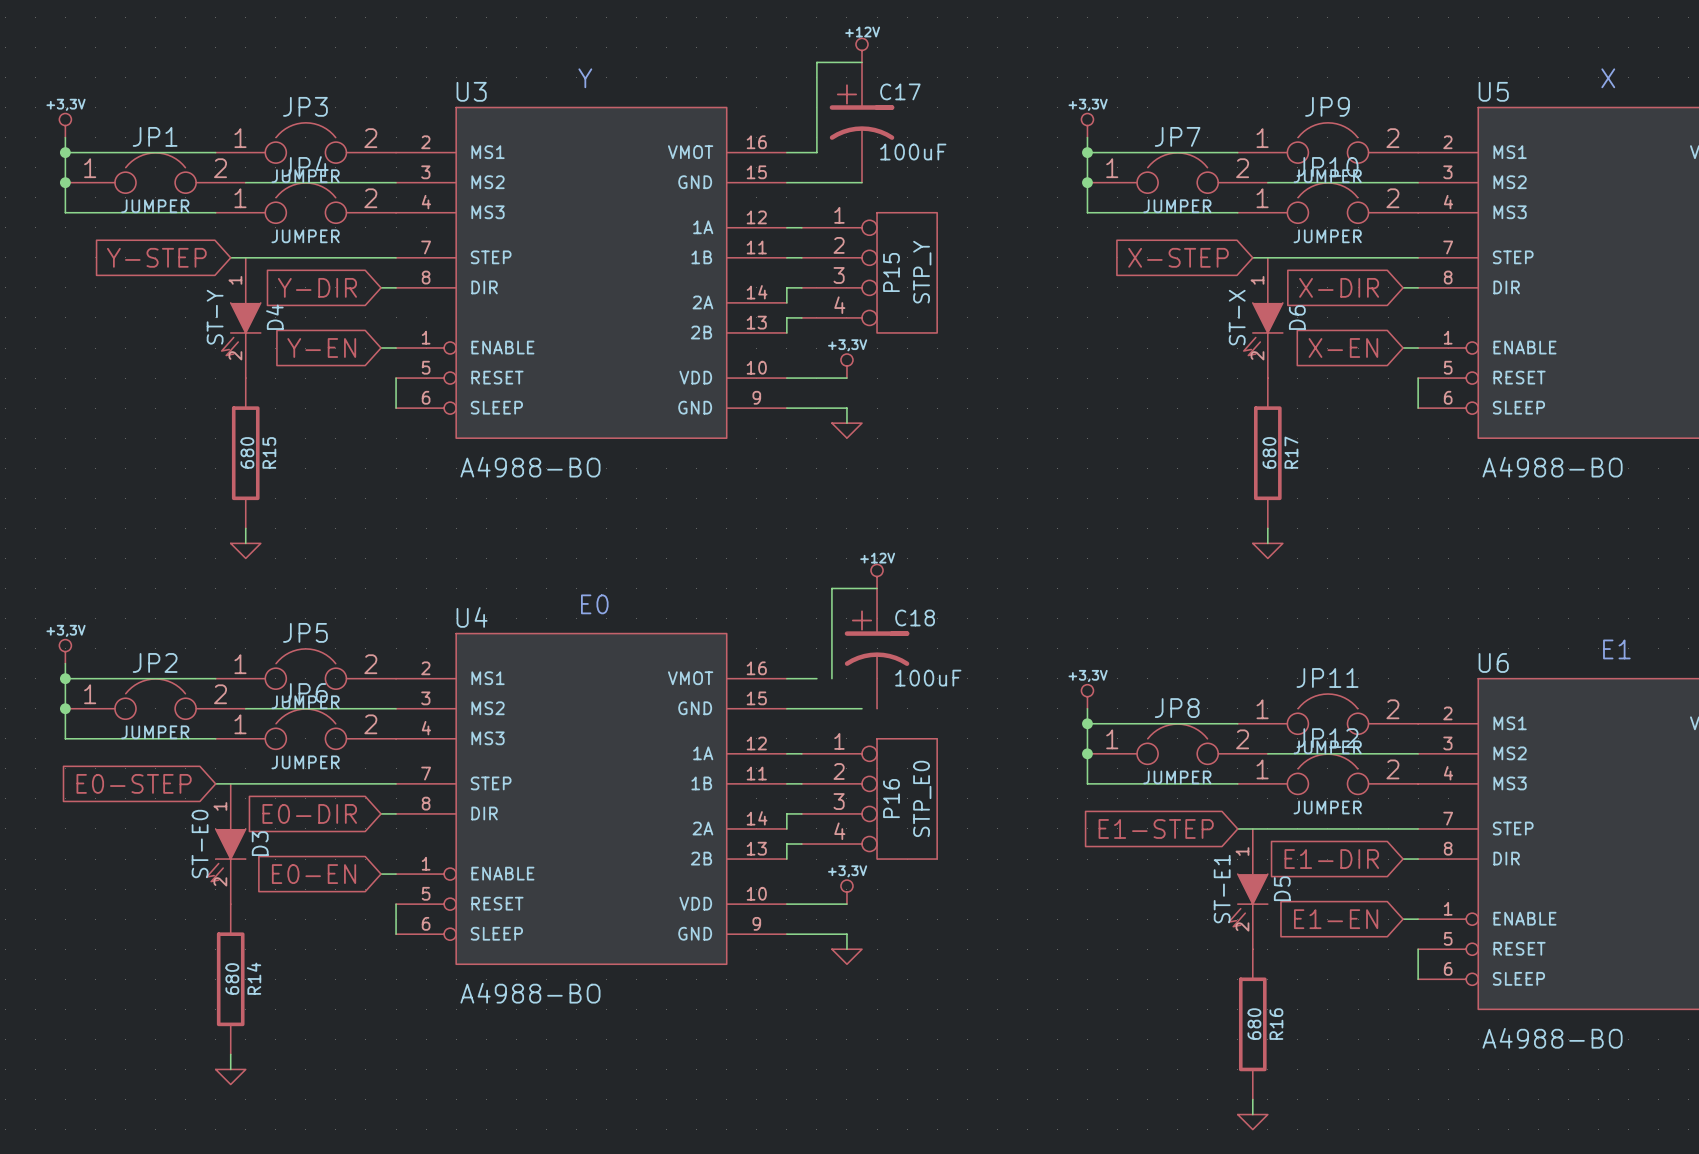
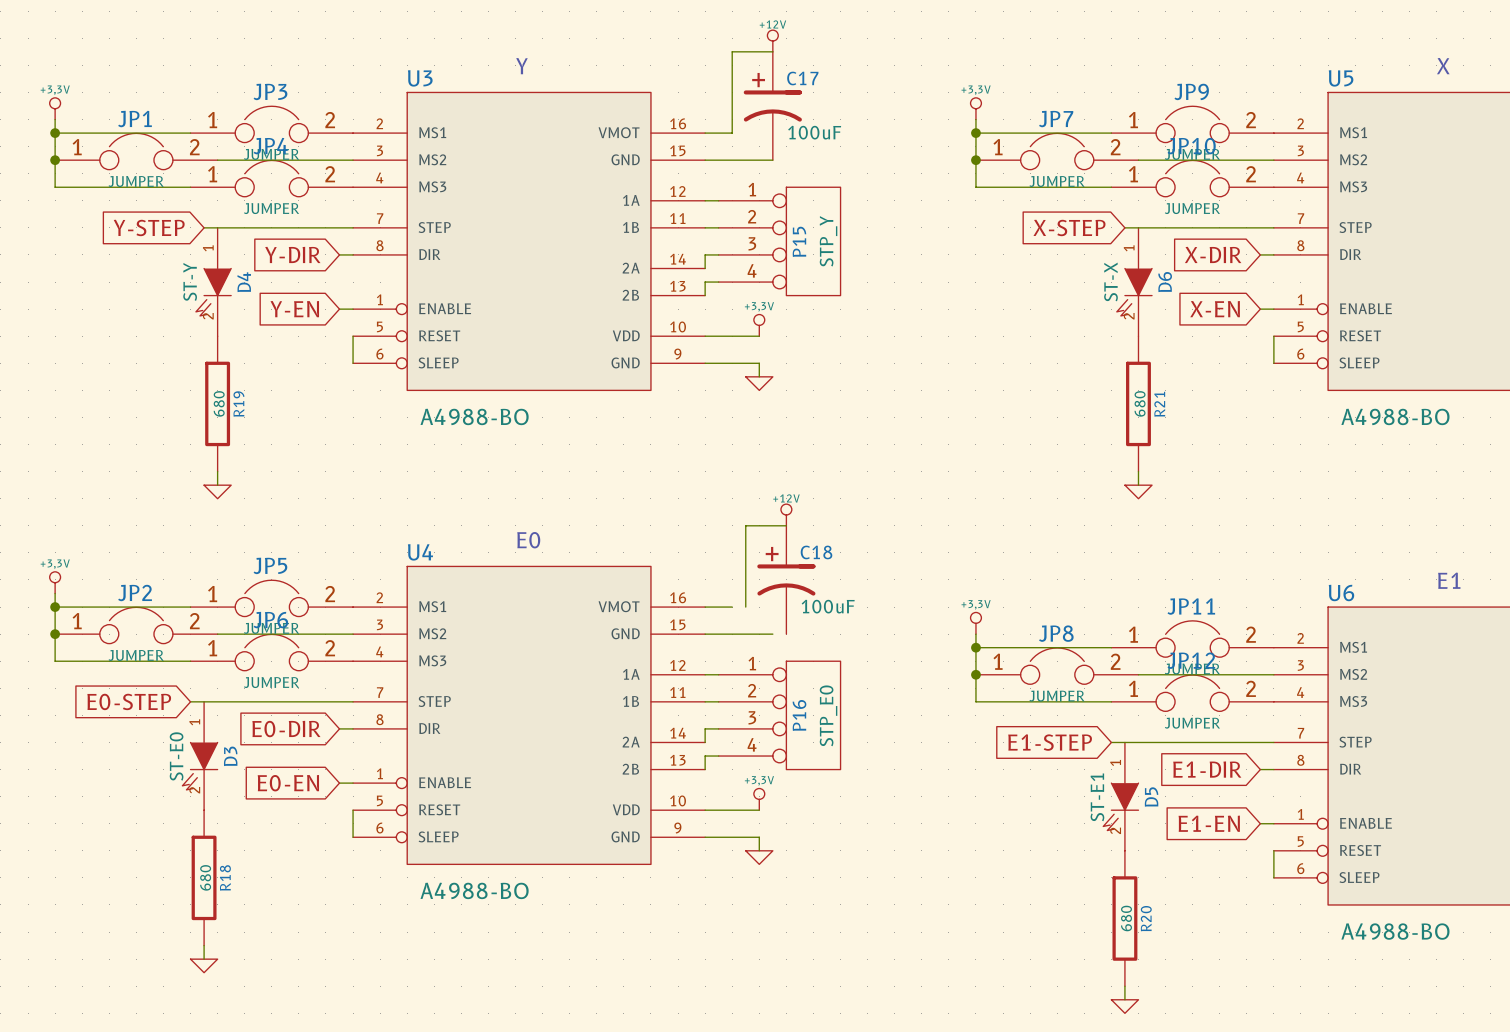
R15 name: R15 (269, 452) -> R19 (238, 404)
R17 name: R17 (1291, 452) -> R21 (1159, 404)
R14 name: R14 (254, 978) -> R18 (225, 877)
R16 name: R16 (1276, 1024) -> R20 (1146, 918)

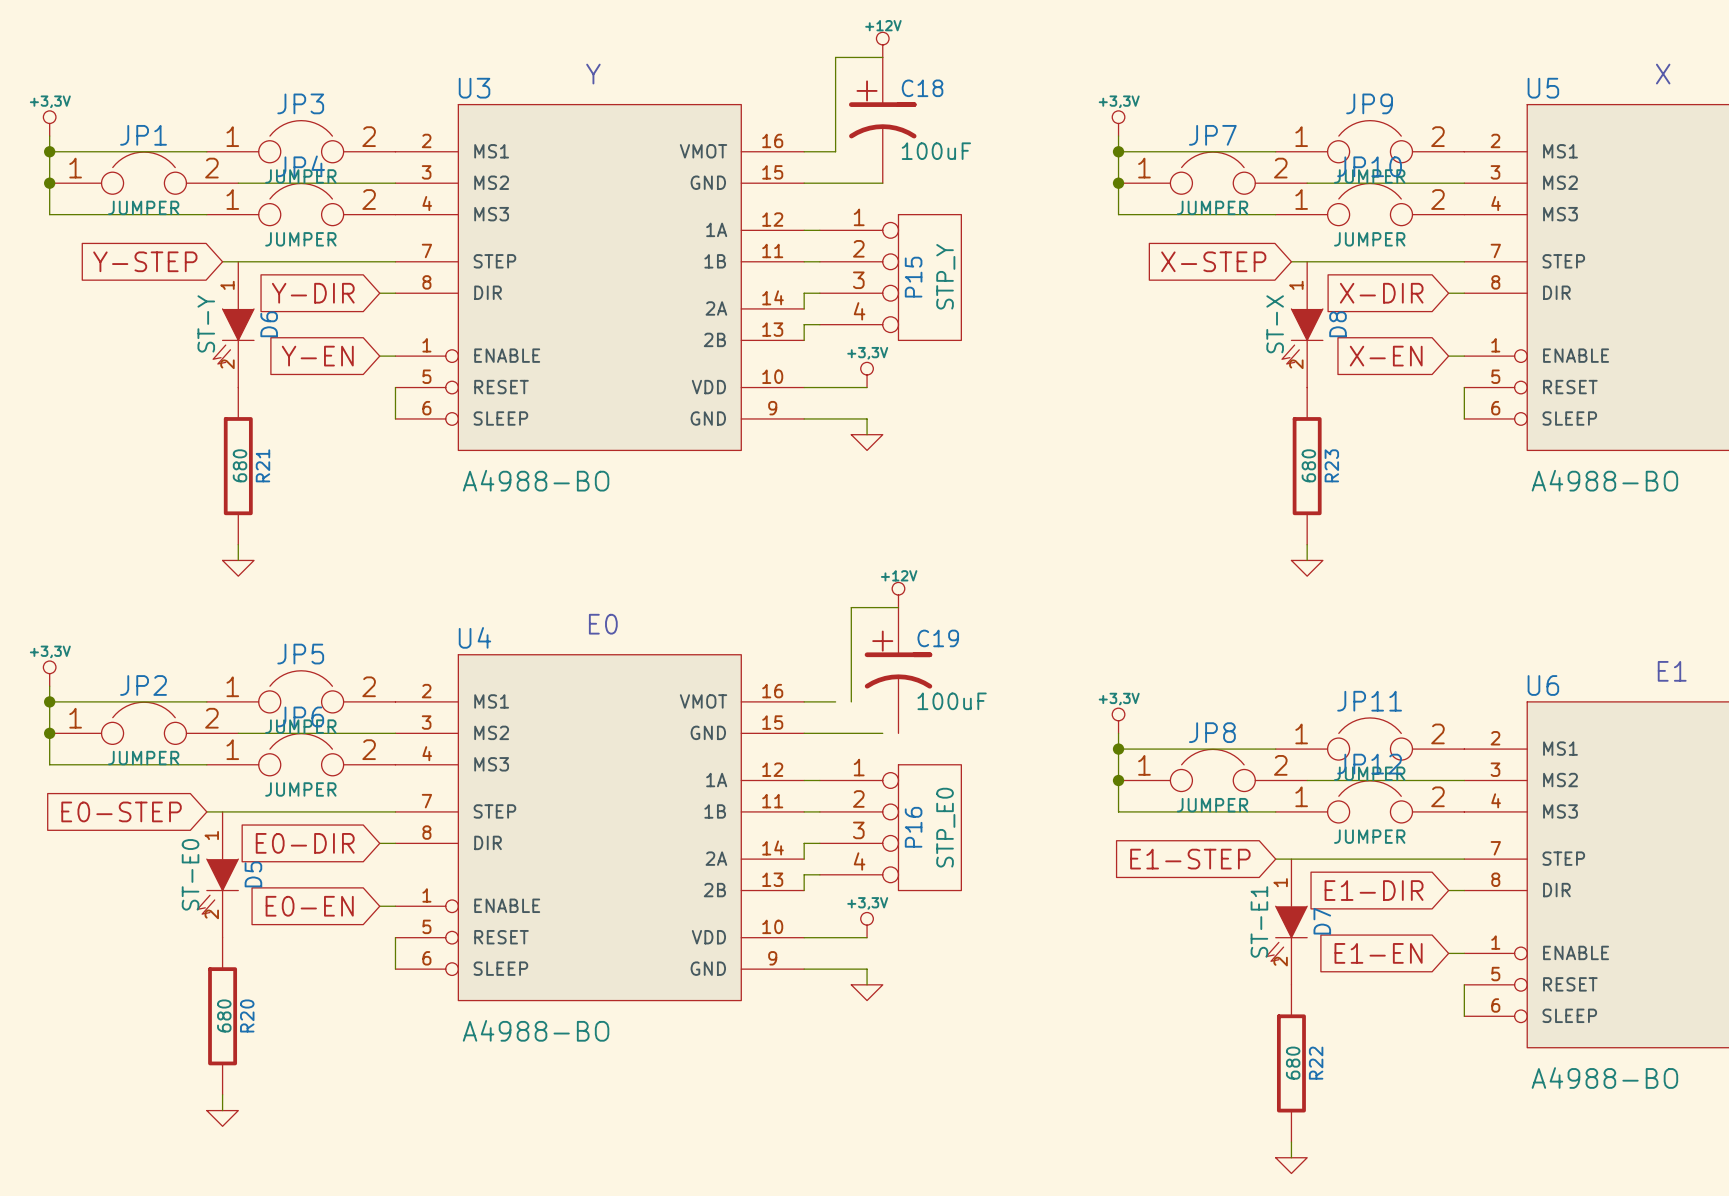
C17 name: C17 (802, 78) -> C18 (922, 88)
D4 name: D4 (244, 282) -> D6 (269, 324)
D6 name: D6 (1165, 282) -> D8 (1338, 324)
R19 name: R19 (238, 404) -> R21 (262, 465)
R21 name: R21 (1159, 404) -> R23 (1331, 465)
C18 name: C18 (816, 552) -> C19 (938, 638)
D3 name: D3 (230, 756) -> D5 (253, 874)
D5 name: D5 (1151, 797) -> D7 (1322, 921)
R18 name: R18 (225, 877) -> R20 (247, 1015)
R20 name: R20 (1146, 918) -> R22 (1316, 1063)

